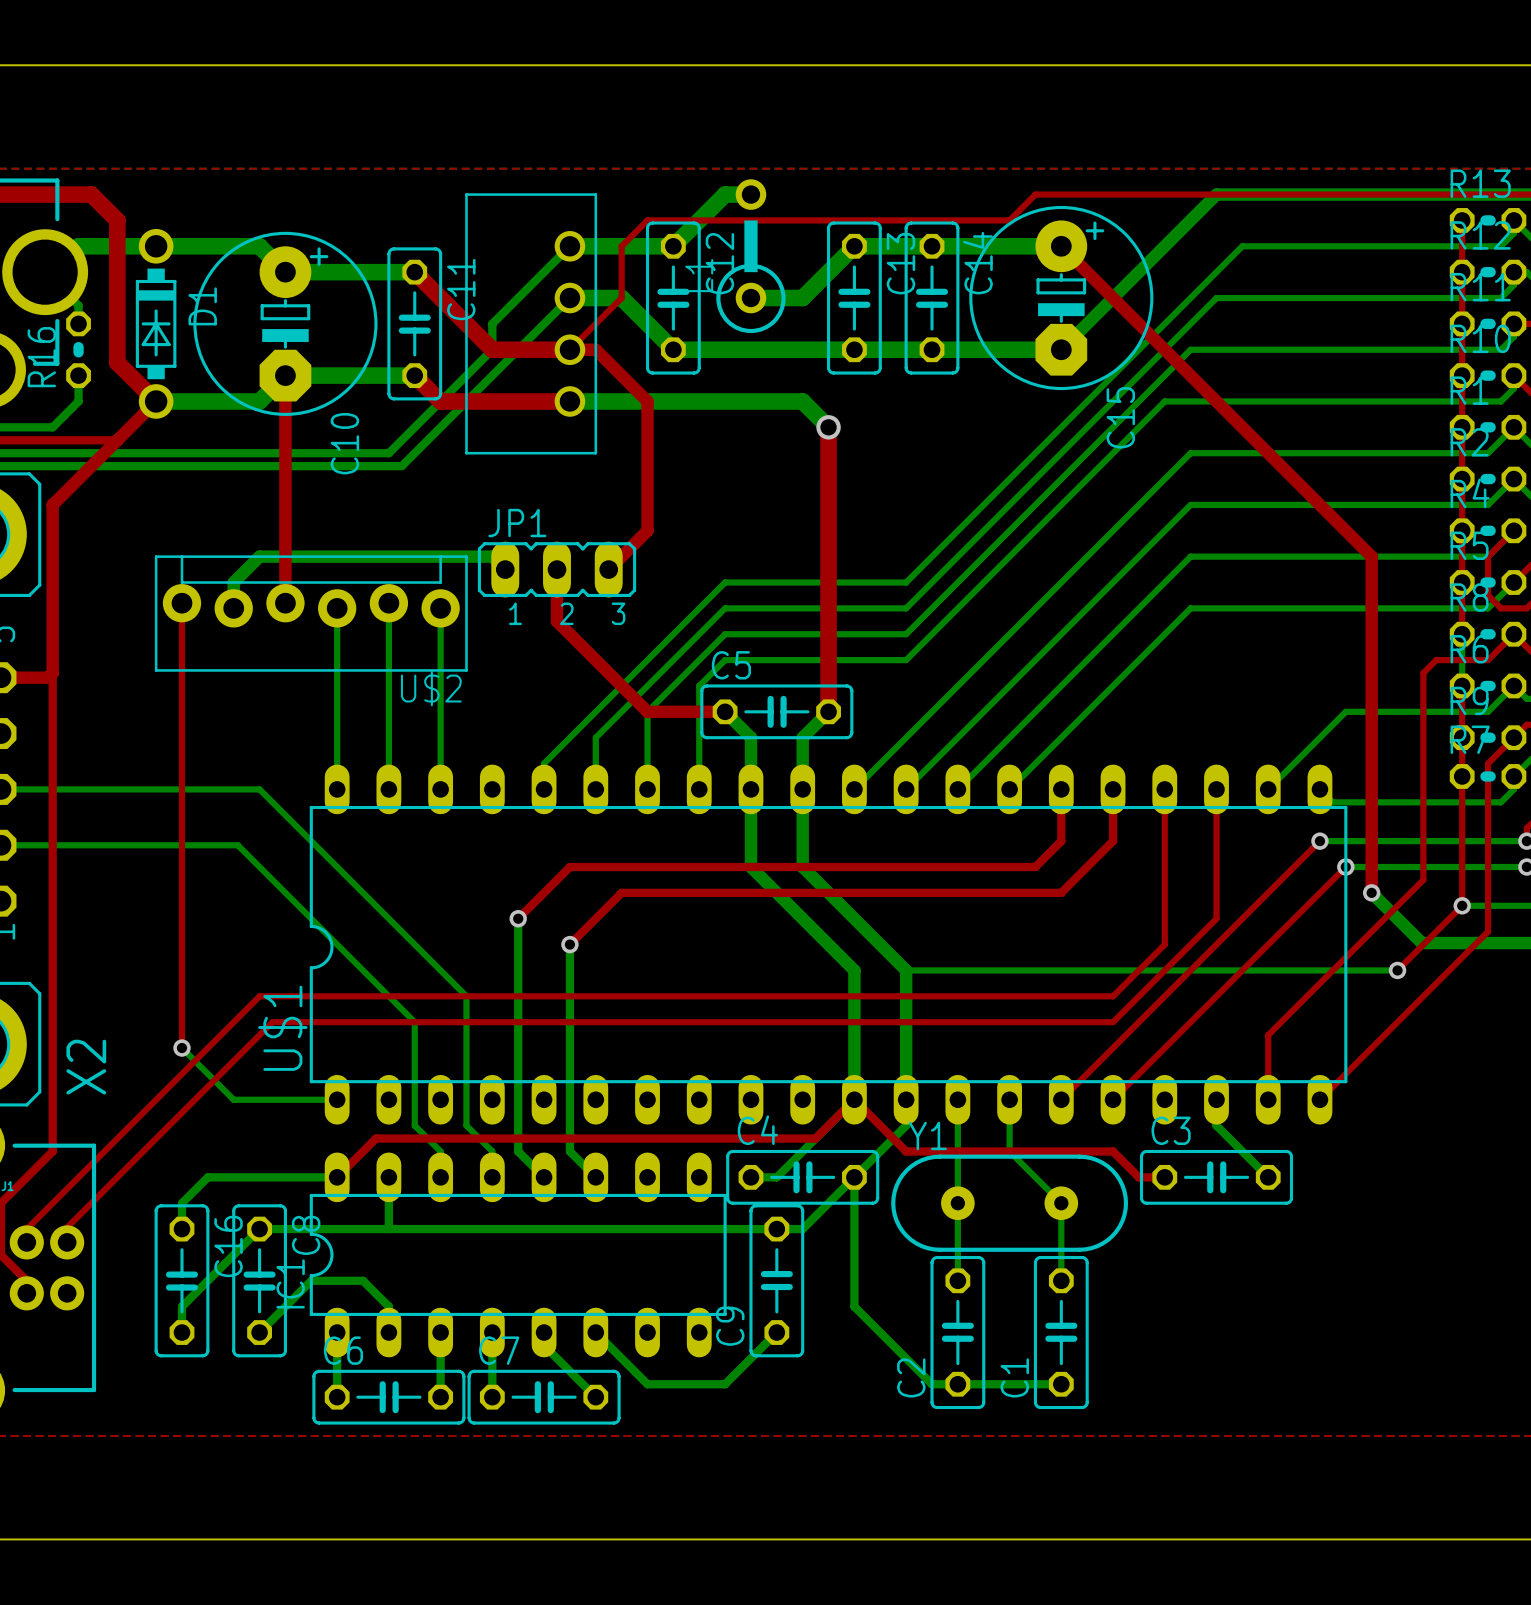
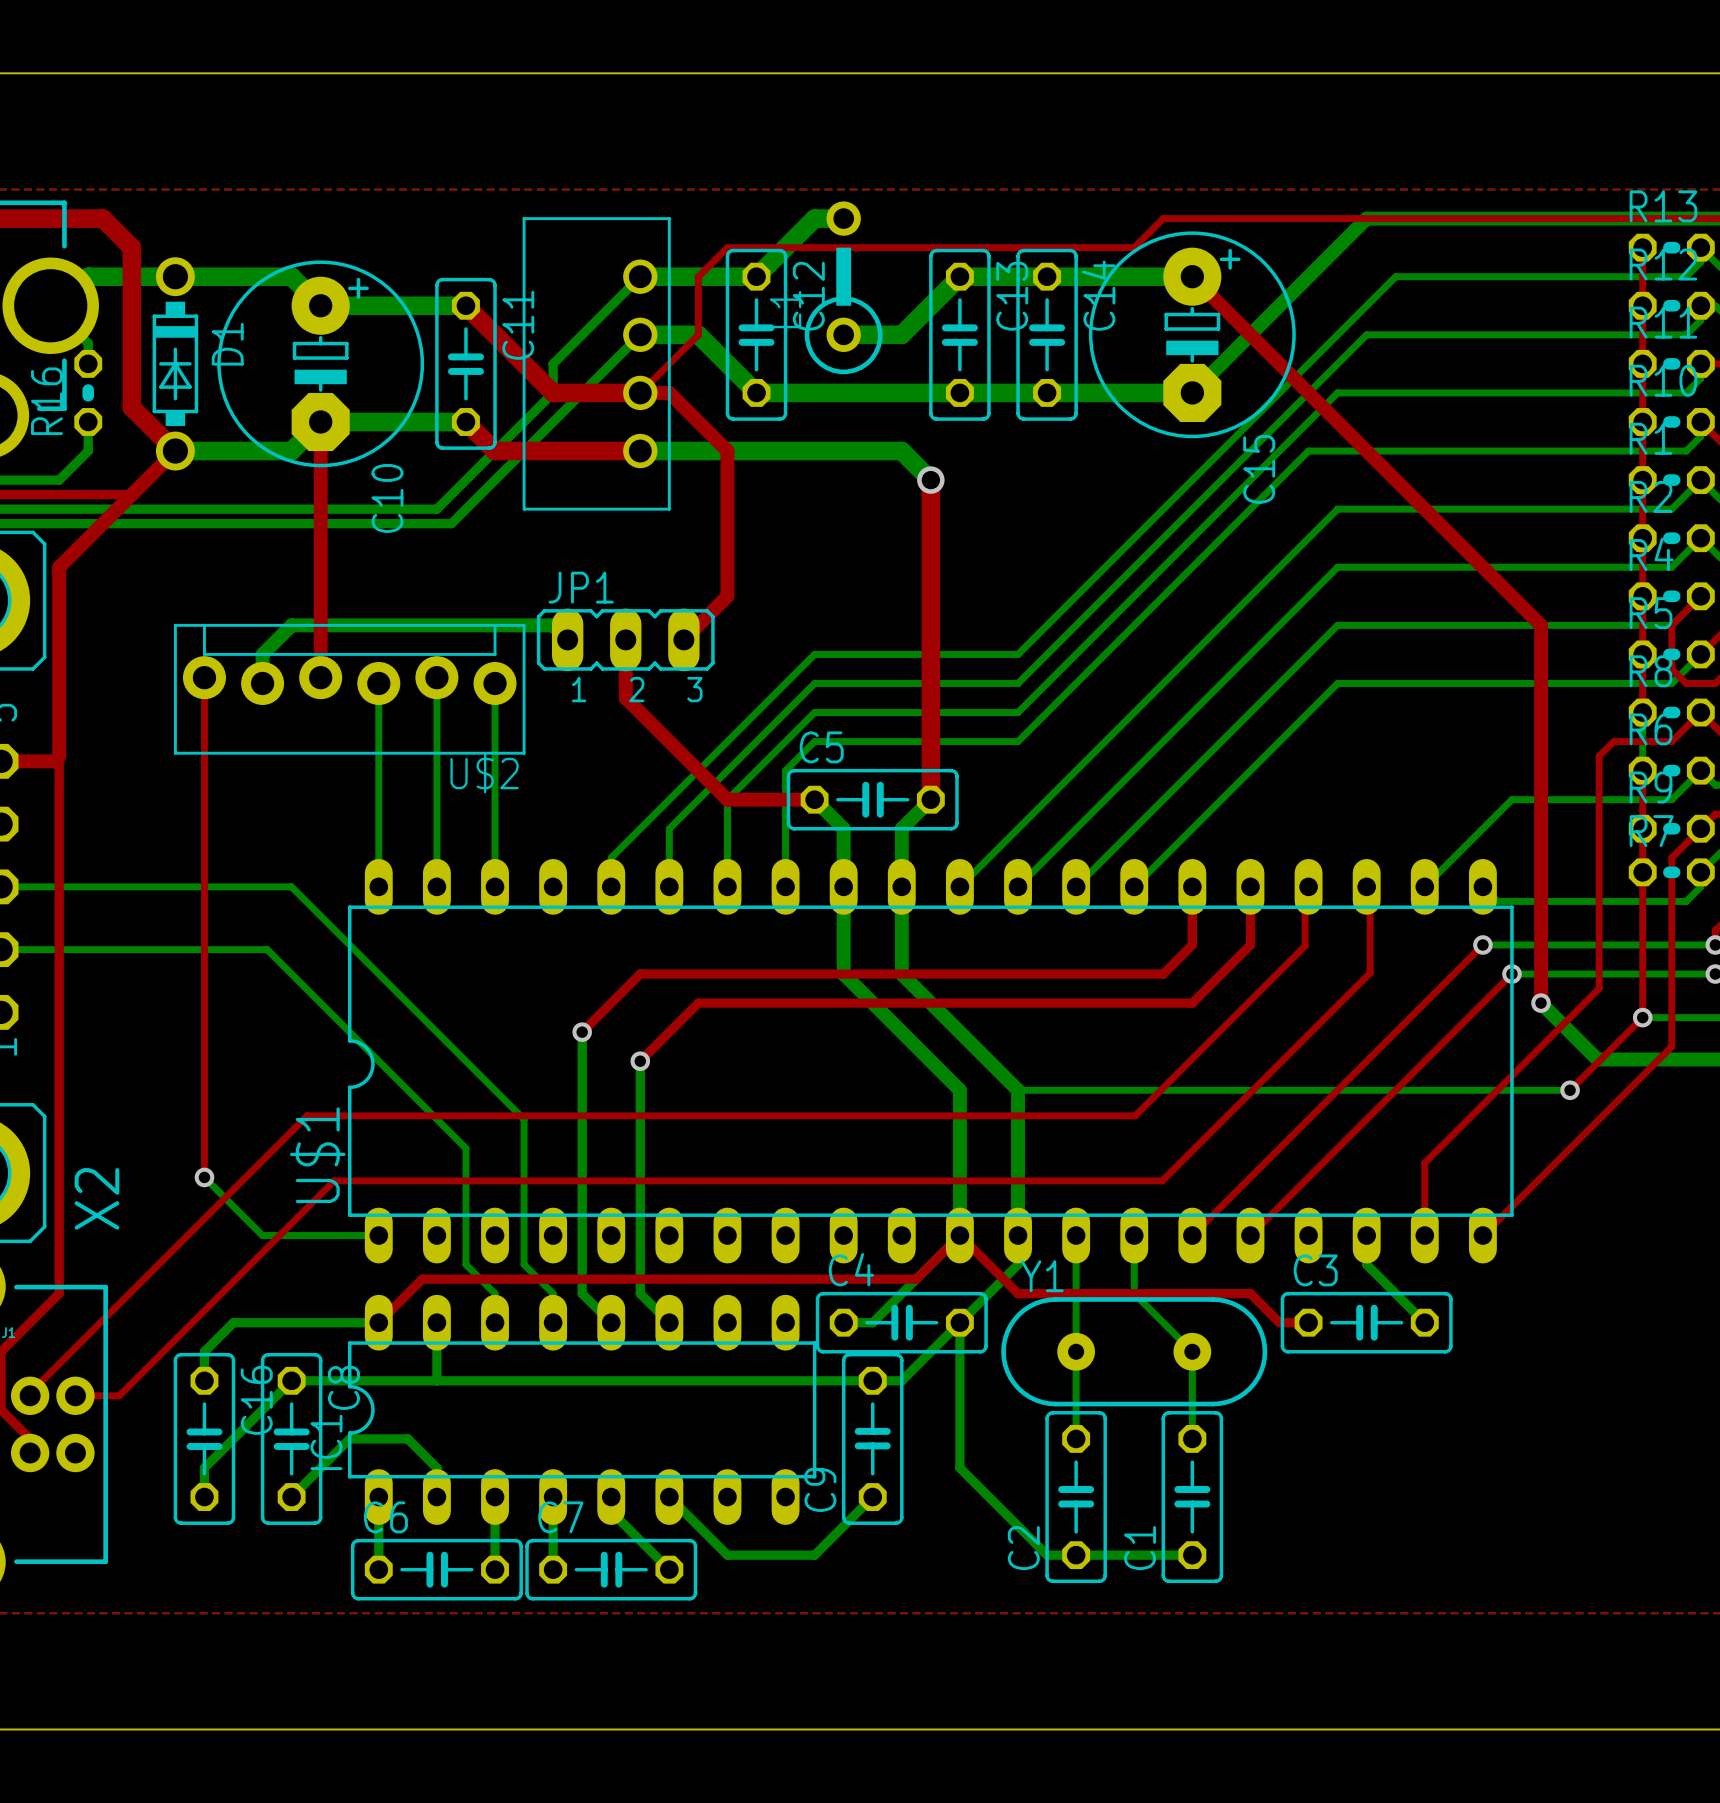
top track: (1164, 789) (1164, 944) (1113, 996) (259, 996) (26, 1229) (26, 1239) -> (1308, 886) (1305, 886) (1305, 946) (1135, 1115) (307, 1115) (30, 1392)
top track: (1216, 789) (1216, 918) (1113, 1022) (272, 1022) (65, 1229) (67, 1229) (67, 1242) -> (1366, 886) (1370, 886) (1370, 972) (1162, 1180) (334, 1180) (119, 1395) (75, 1395)

